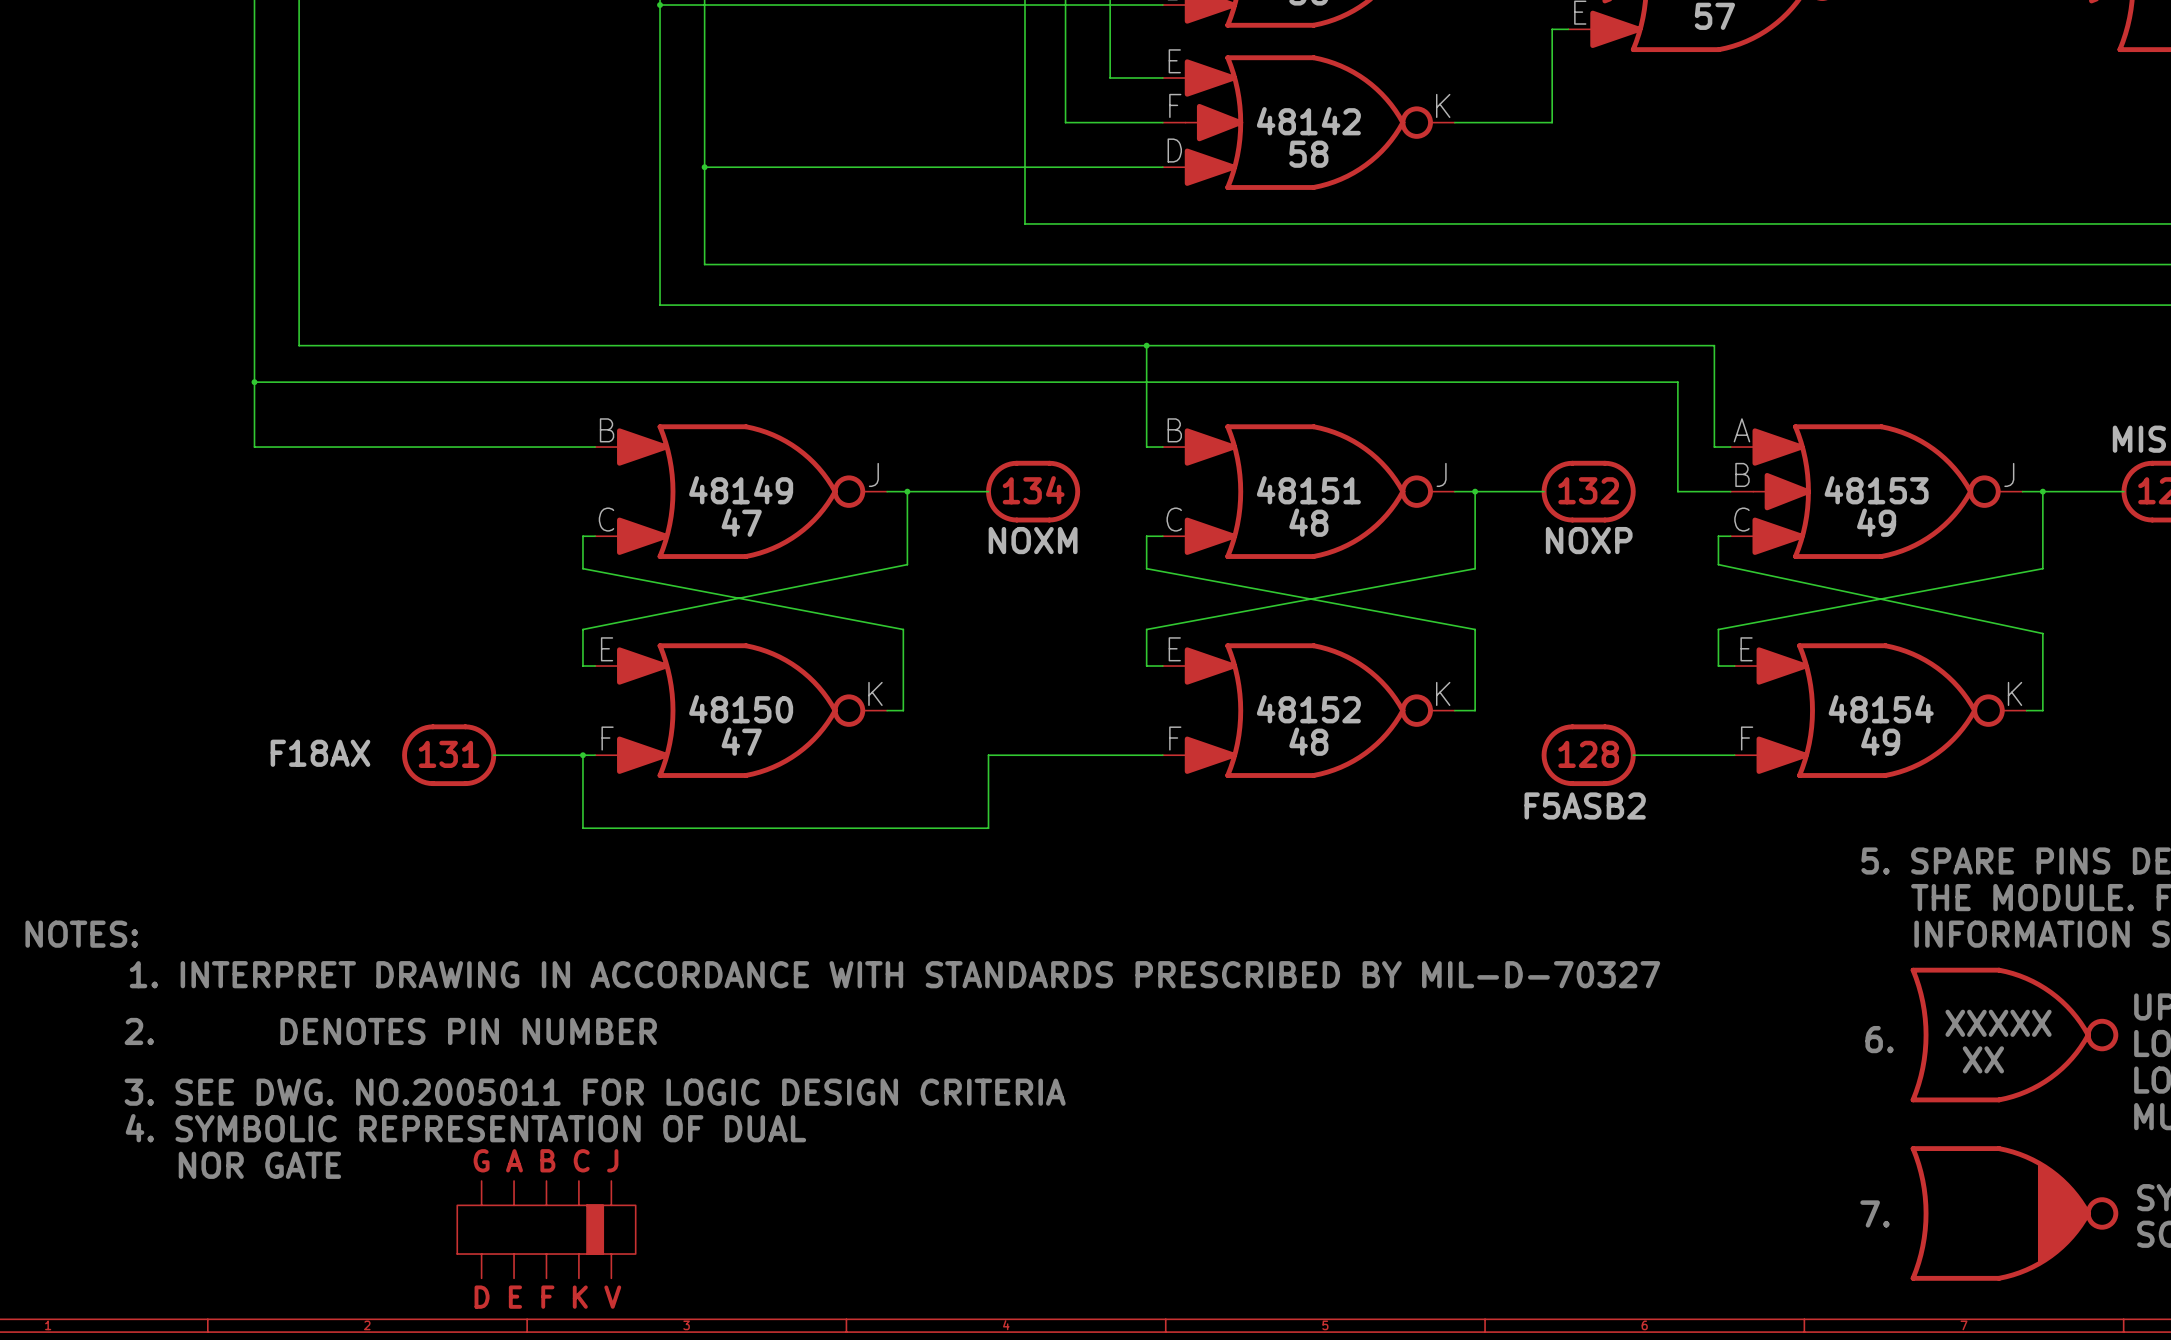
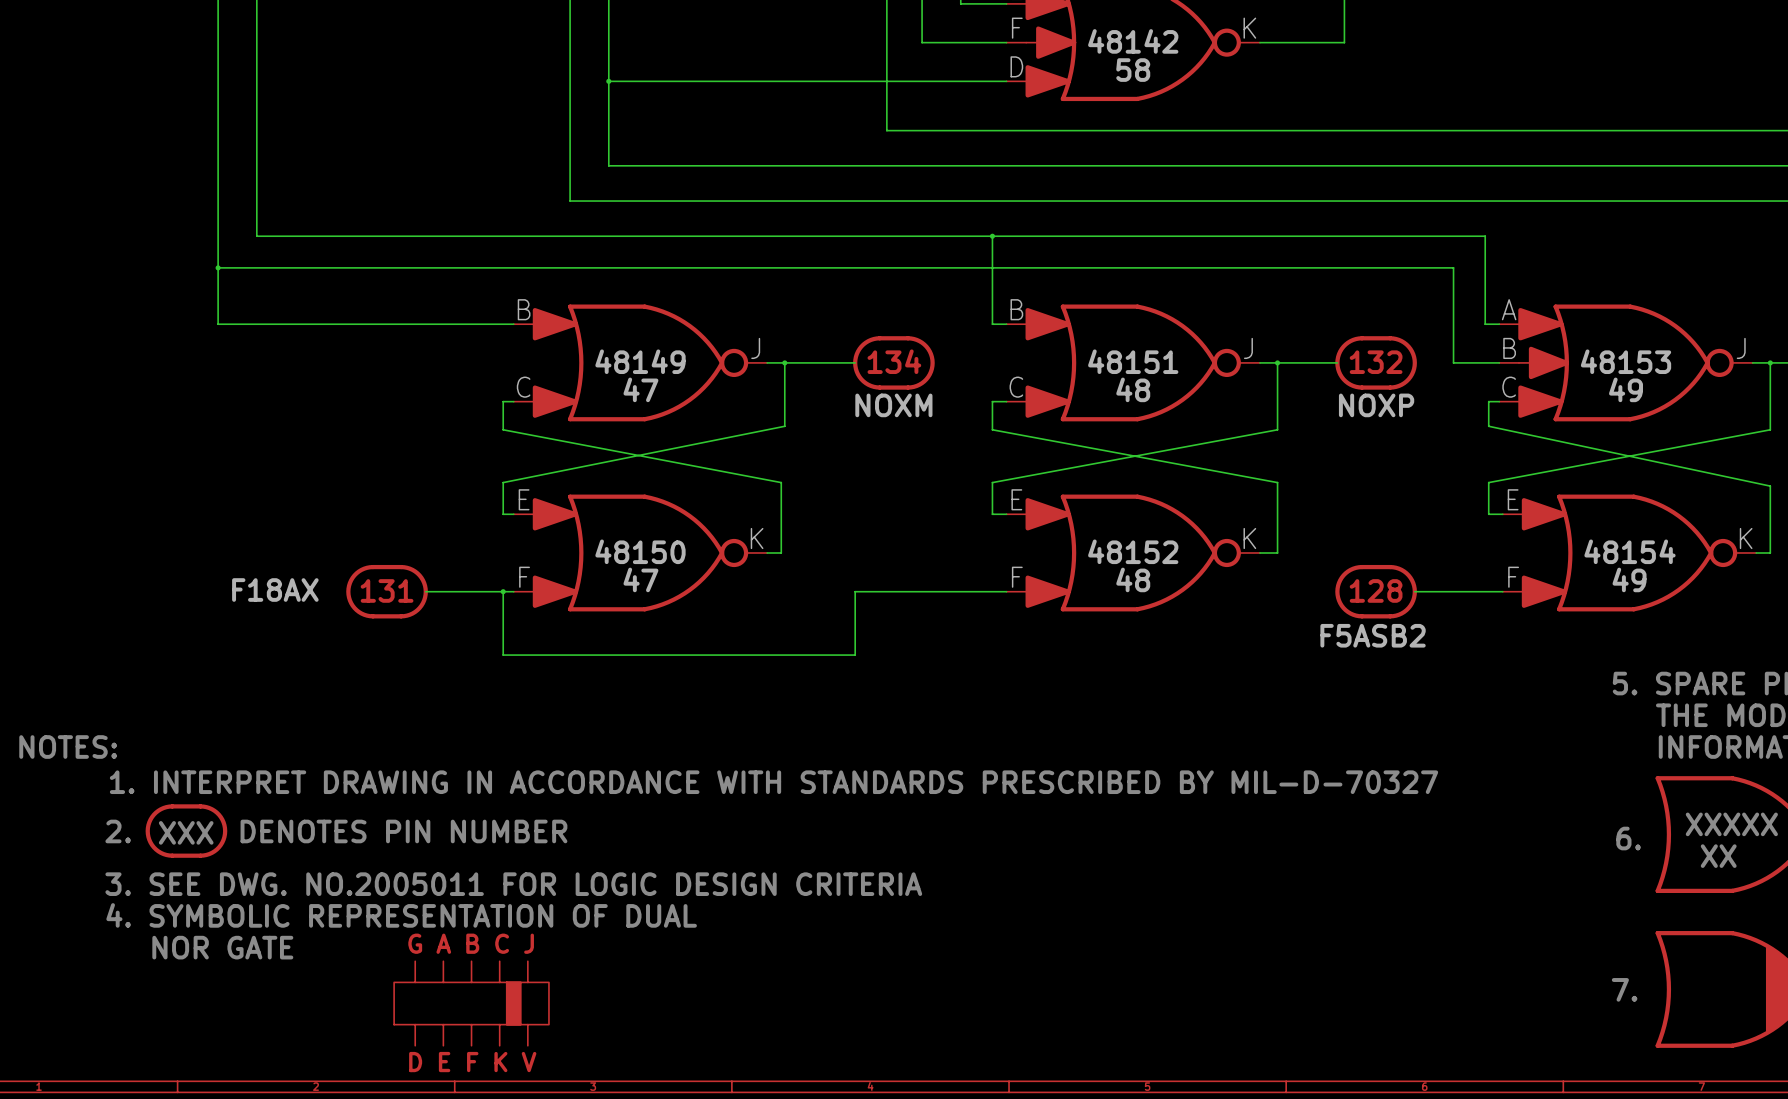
part: none -> (186, 831)
text: none -> XXX (186, 832)

